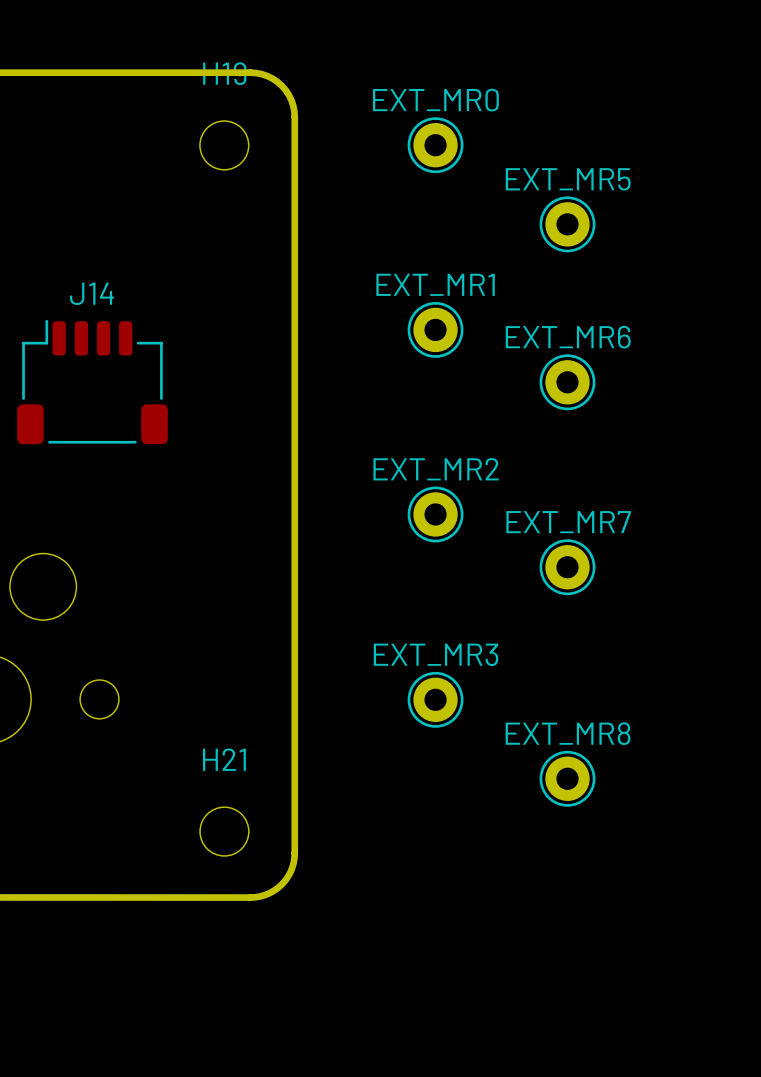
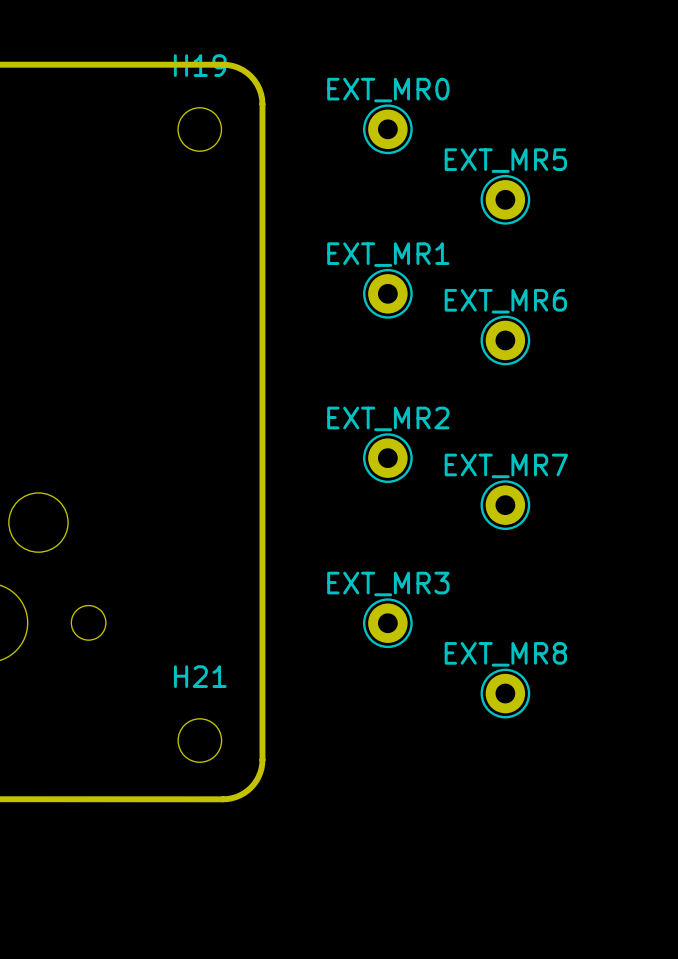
J14: (92, 382) -> none

